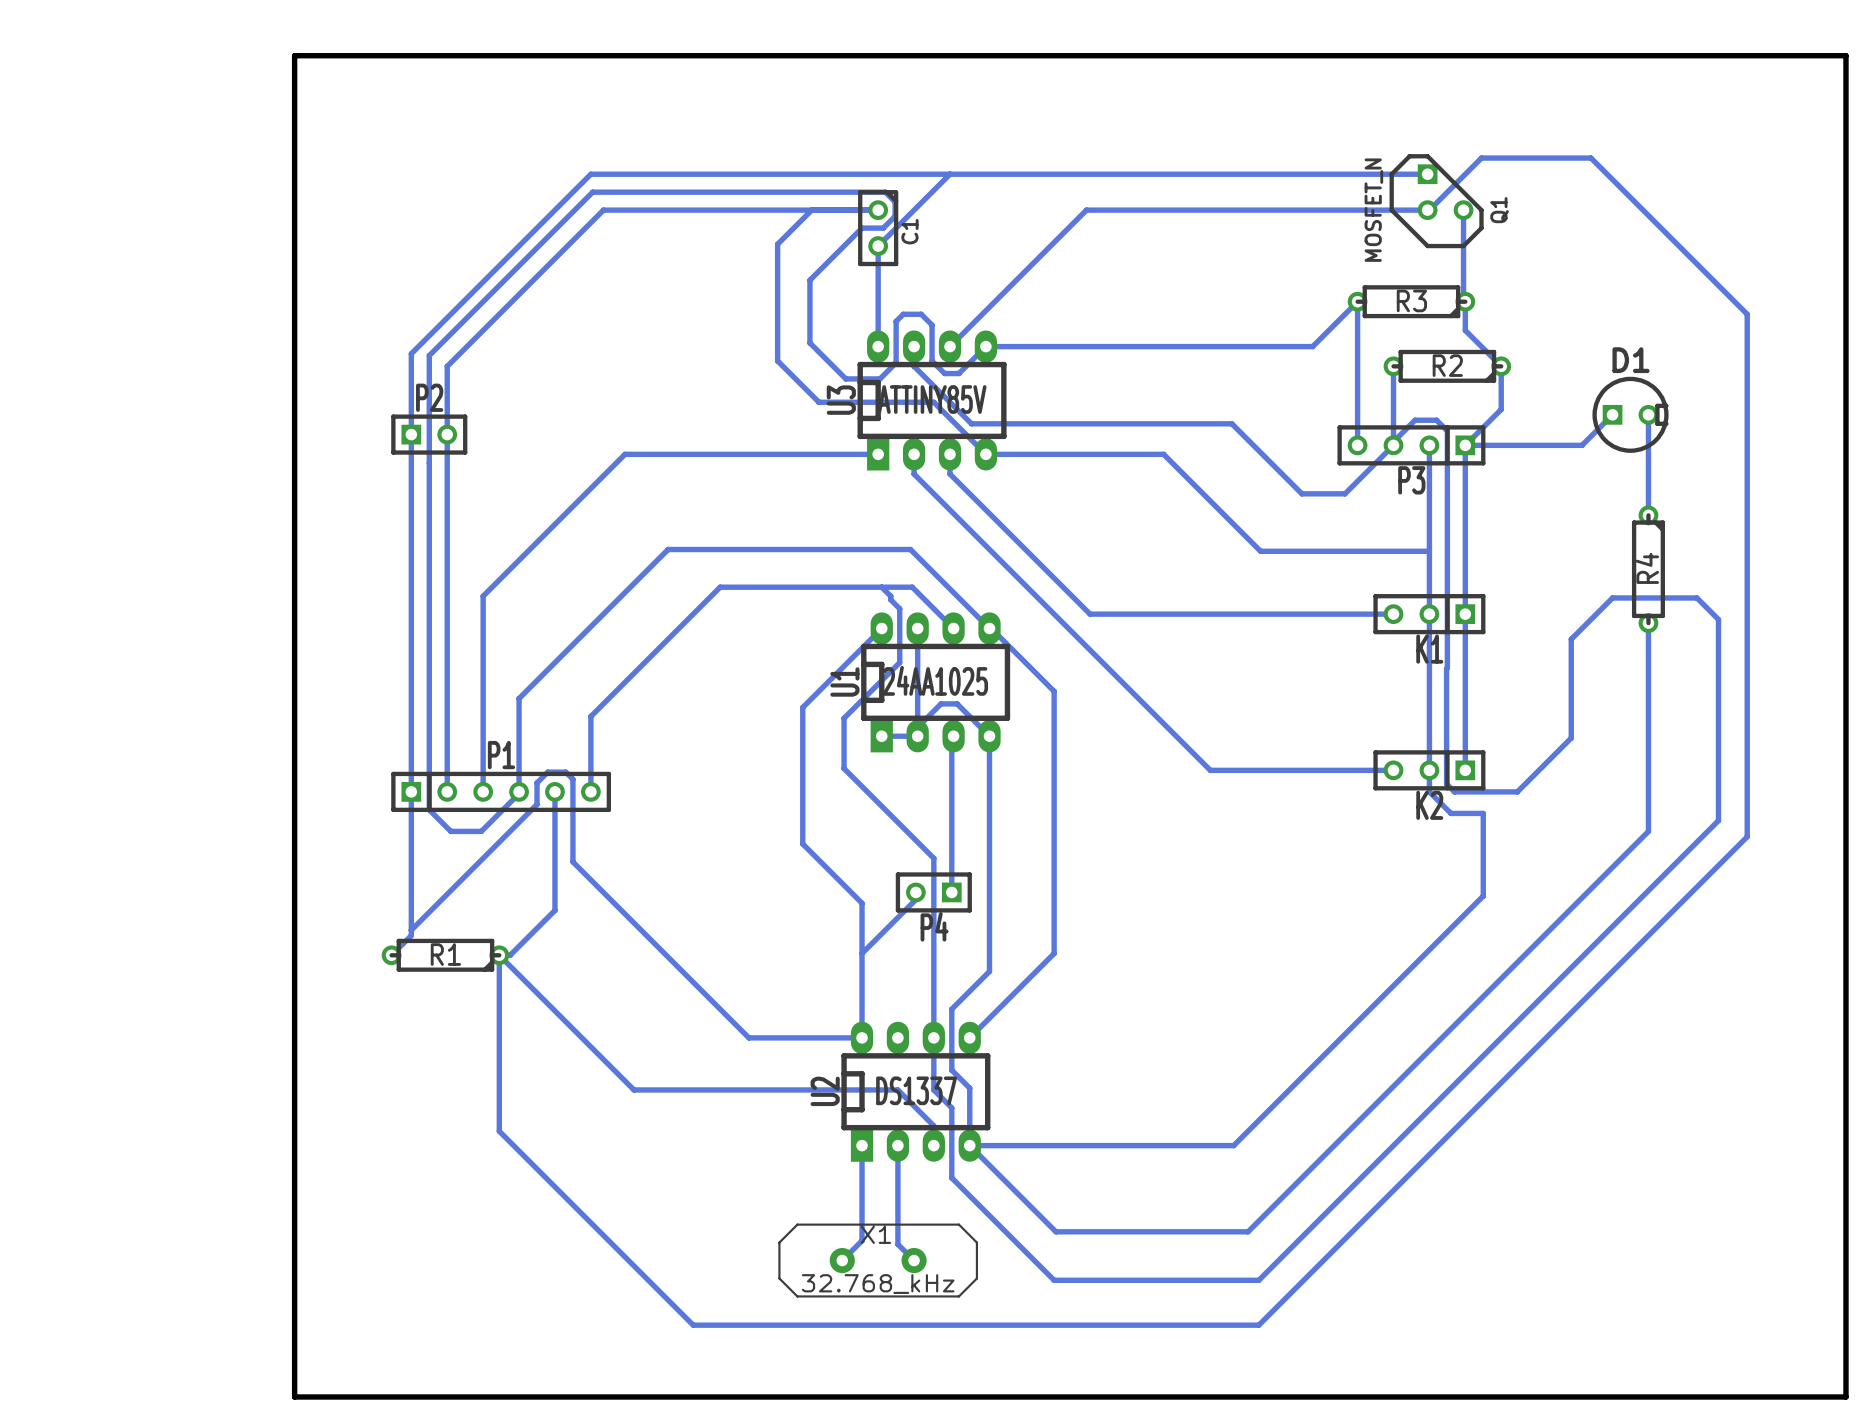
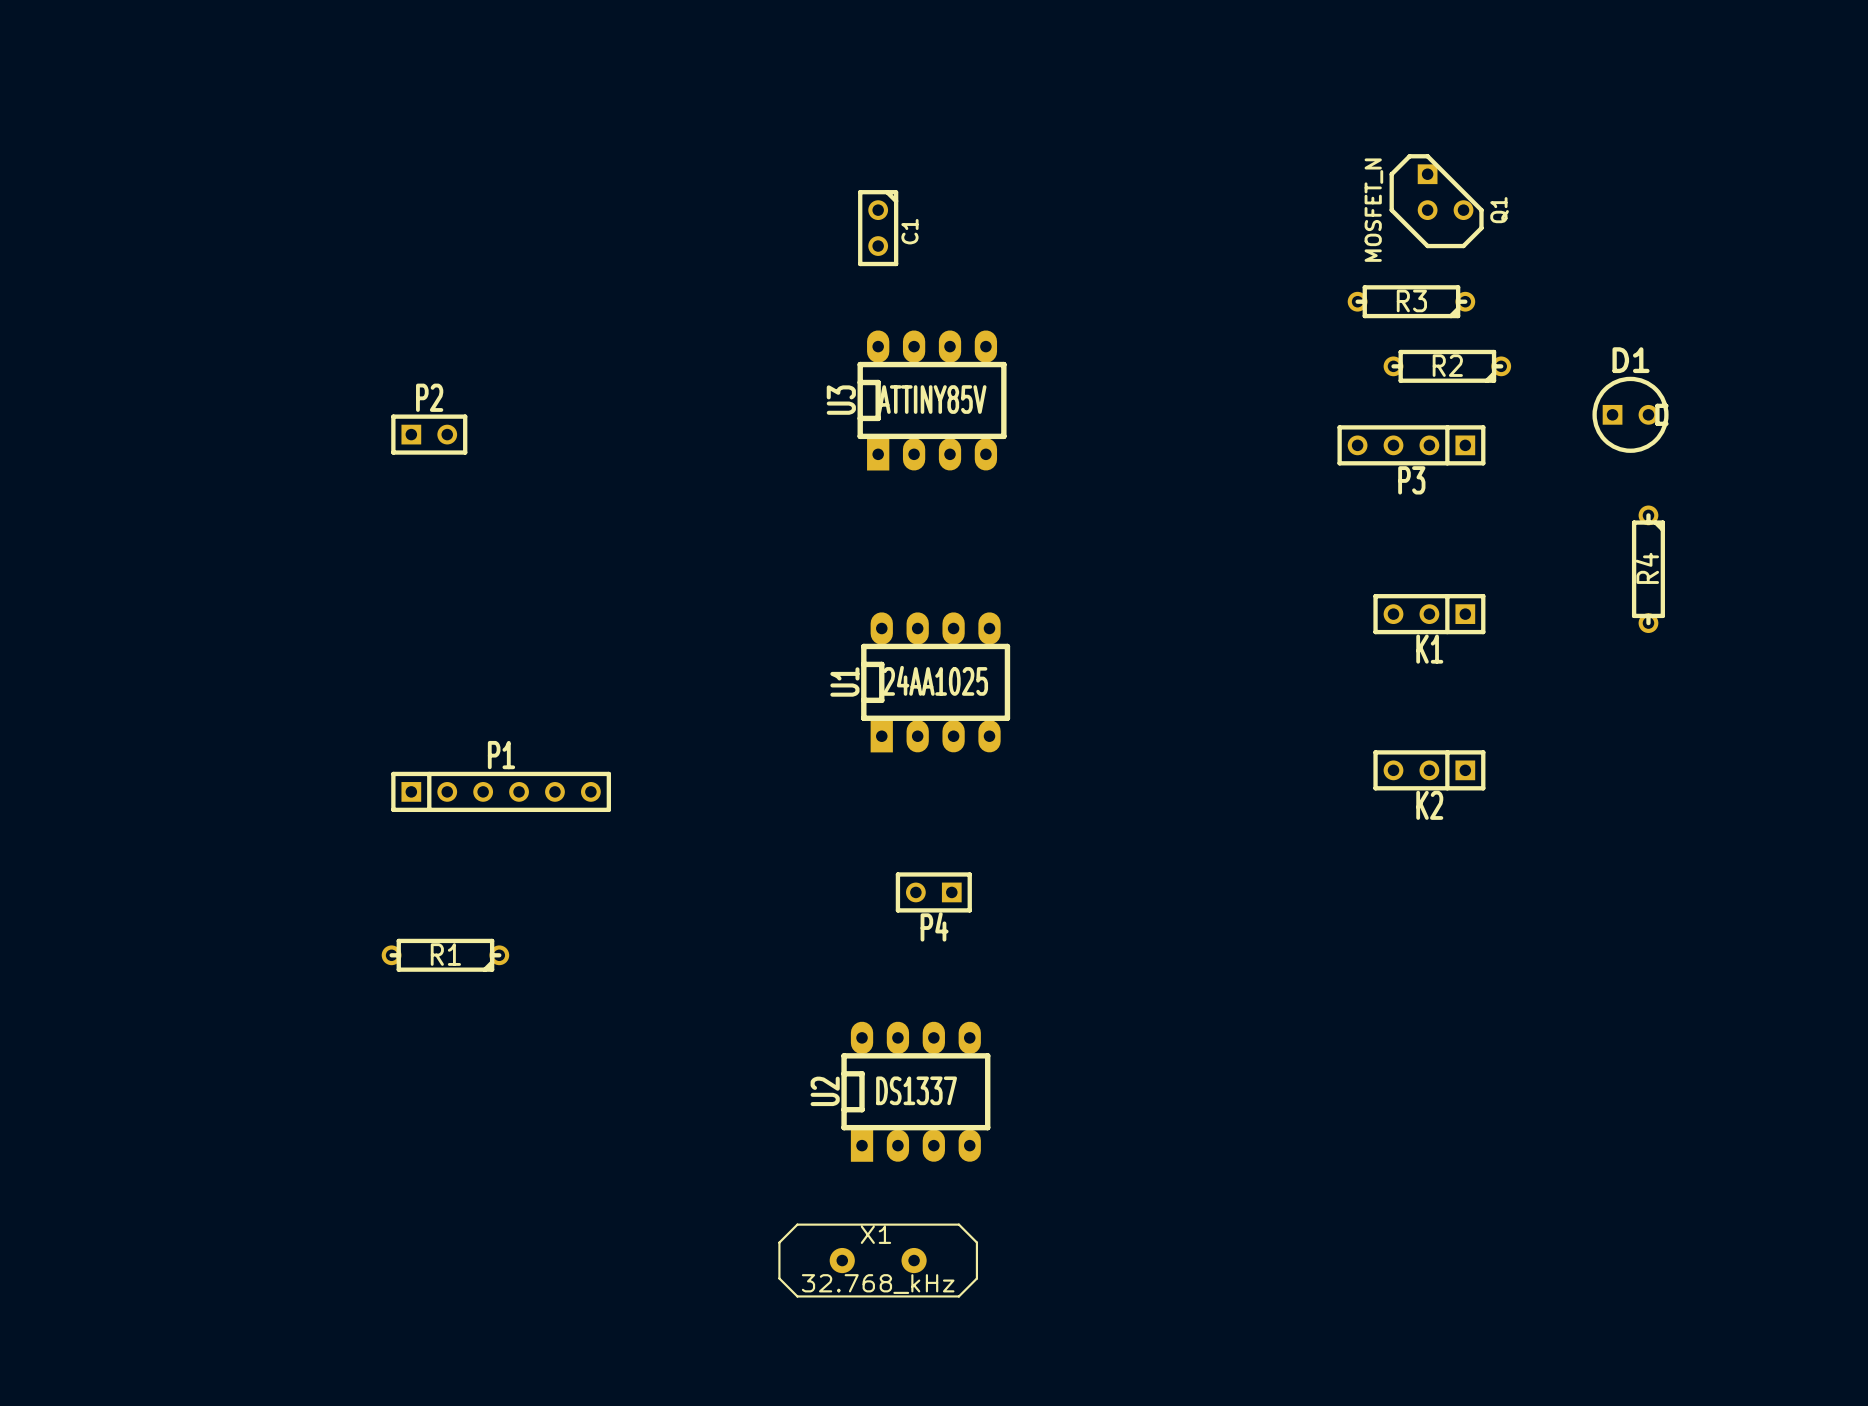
board edge: (294, 55) (294, 1397) (1845, 1397) (1845, 55) (294, 55) -> none
bottom track: (950, 174) (878, 246) (878, 346) -> none
bottom track: (1427, 174) (590, 174) (411, 353) (411, 935) (391, 955) -> none
bottom track: (811, 210) (777, 244) (777, 360) (818, 402) (933, 402) (985, 454) (1163, 454) (1260, 551) (1429, 551) -> none
bottom track: (878, 210) (603, 210) (447, 366) (447, 791) -> none
bottom track: (1463, 210) (1465, 330) (1501, 366) (1501, 409) (1465, 445) -> none
bottom track: (914, 346) (914, 366) (971, 423) (1231, 423) (1301, 493) (1345, 493) (1393, 445) (1393, 366) -> none
bottom track: (950, 346) (1086, 210) (1429, 210) (1481, 158) (1591, 158) (1747, 314) (1747, 836) (1258, 1325) (693, 1325) (499, 1131) (499, 955) -> none
bottom track: (1612, 414) (1582, 445) (1465, 445) -> none
bottom track: (1648, 414) (1648, 515) -> none
bottom track: (1393, 441) (1415, 420) (1436, 420) (1447, 430) (1446, 783) (1454, 791) (1517, 791) (1571, 738) (1571, 639) (1612, 597) (1696, 597) (1718, 619) (1718, 820) (1258, 1280) (1054, 1280) (951, 1177) (951, 1107) (933, 1089) (933, 858) (844, 768) (844, 718) (899, 662) (899, 608) (881, 587) -> none
bottom track: (1357, 445) (1357, 301) (1312, 346) (985, 346) (958, 373) (944, 373) (932, 360) (932, 325) (921, 314) (903, 314) (896, 321) (896, 362) (879, 378) (845, 378) (809, 343) (809, 280) (862, 228) (883, 228) (895, 216) (895, 201) (885, 192) (592, 192) (429, 355) (429, 809) (450, 831) (481, 831) (519, 793) (519, 698) (668, 549) (910, 549) (1054, 691) (1054, 953) (969, 1037) -> none
bottom track: (1429, 445) (1429, 791) (1450, 813) (1483, 813) (1483, 896) (1233, 1145) (969, 1145) -> none
bottom track: (1465, 445) (1465, 770) -> none
bottom track: (878, 454) (625, 454) (483, 596) (483, 791) -> none
bottom track: (914, 454) (914, 474) (1210, 770) (1393, 770) -> none
bottom track: (950, 454) (950, 474) (1090, 614) (1393, 614) -> none
bottom track: (1648, 623) (1648, 831) (1248, 1231) (1055, 1231) (969, 1145) -> none
bottom track: (881, 628) (802, 707) (802, 843) (862, 903) (862, 1037) (748, 1037) (572, 861) (572, 779) (565, 772) (547, 772) (537, 782) (537, 804) (411, 930) -> none
bottom track: (917, 628) (917, 736) (881, 736) -> none
bottom track: (953, 628) (912, 587) (720, 587) (590, 716) (590, 791) -> none
bottom track: (917, 727) (941, 703) (957, 703) (989, 736) (989, 971) (951, 1009) (951, 1070) (969, 1088) (969, 1145) -> none
bottom track: (953, 736) (951, 738) (951, 892) -> none
bottom track: (554, 791) (554, 910) (510, 955) (499, 955) -> none
bottom track: (915, 892) (915, 899) (862, 953) -> none
bottom track: (499, 955) (633, 1089) (897, 1089) (933, 1125) (933, 1145) -> none
bottom track: (862, 1145) (862, 1240) (842, 1260) -> none
bottom track: (897, 1145) (897, 1244) (914, 1260) -> none

